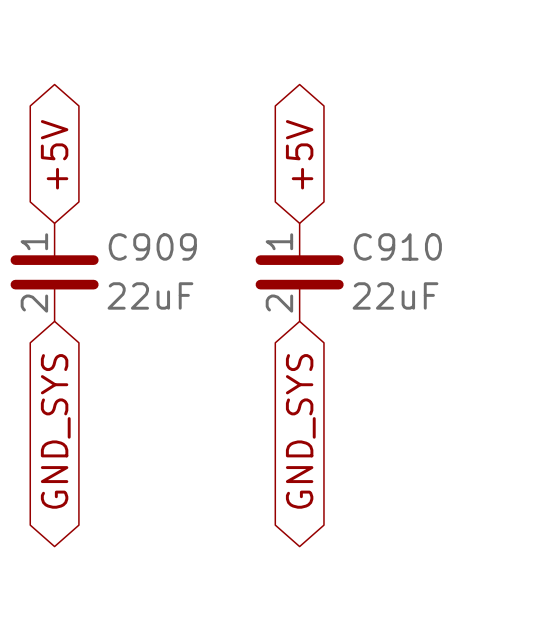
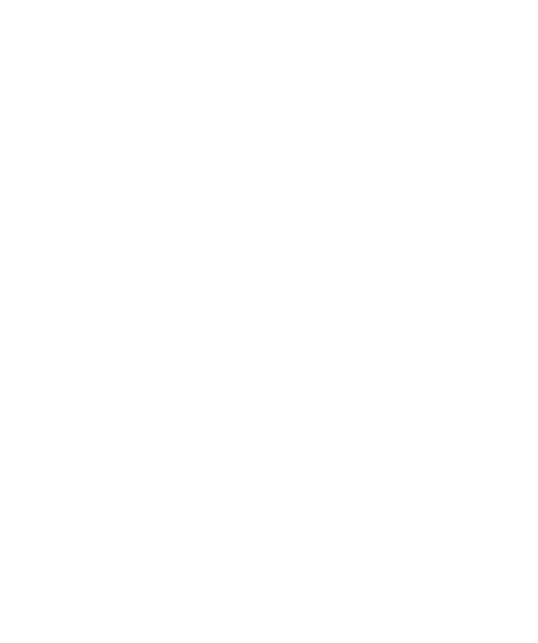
global label: +5V (54, 154) -> none
global label: +5V (299, 154) -> none
C909: 22uF (54, 272) -> none
C910: 22uF (299, 272) -> none
global label: GND_SYS (55, 431) -> none
global label: GND_SYS (300, 431) -> none

